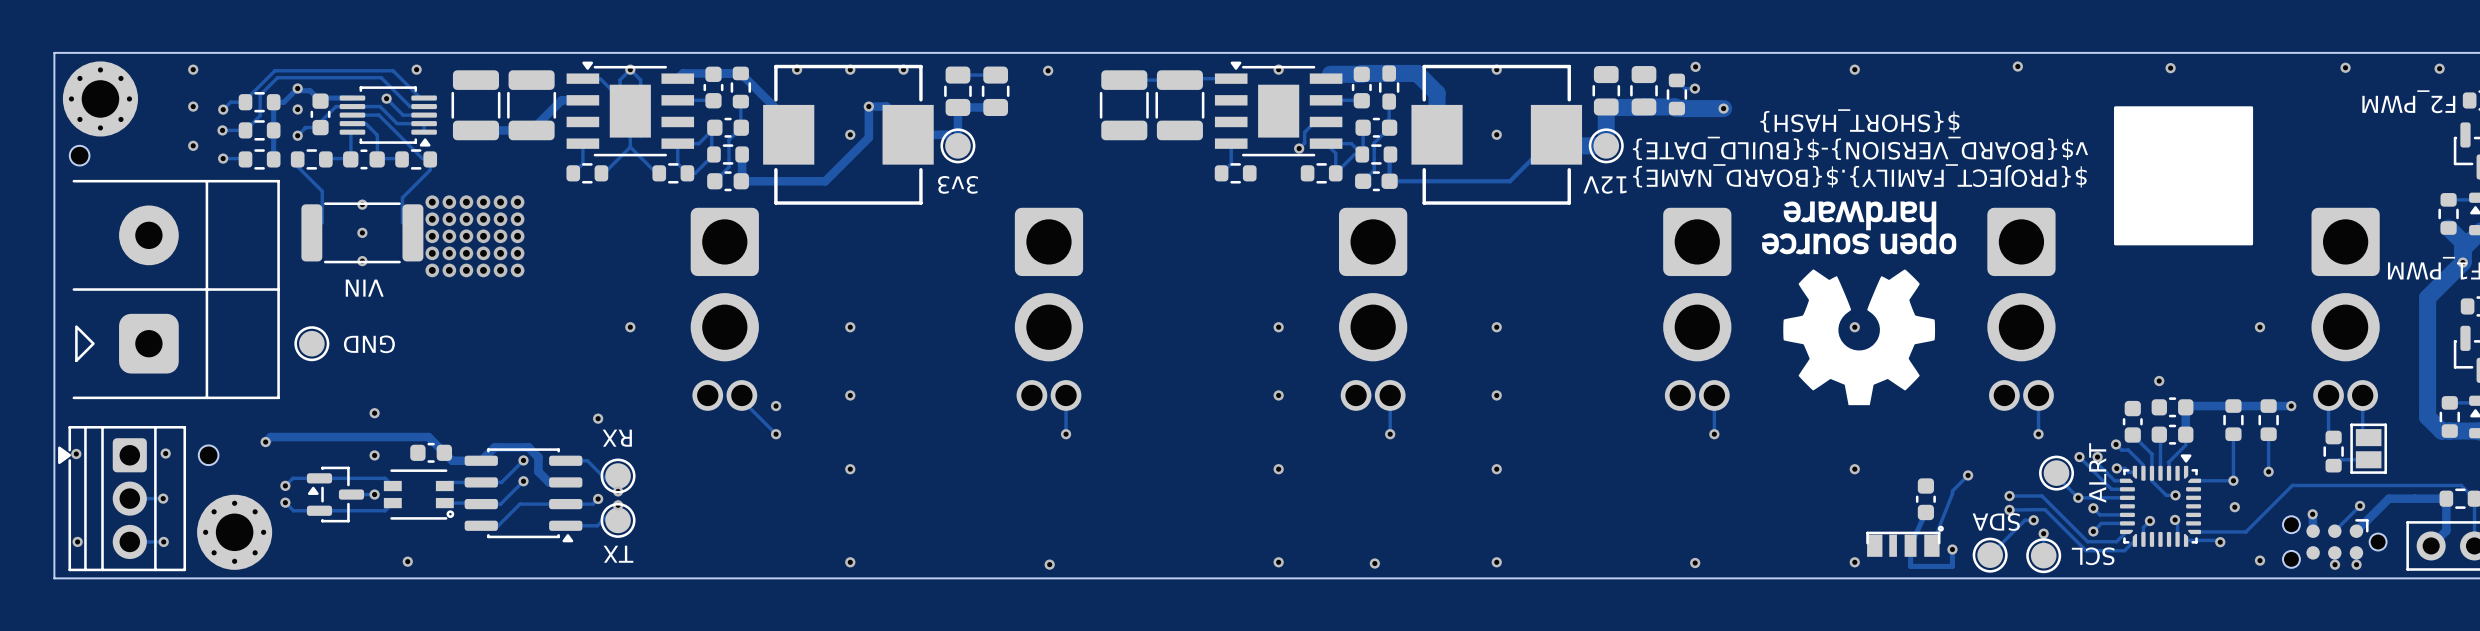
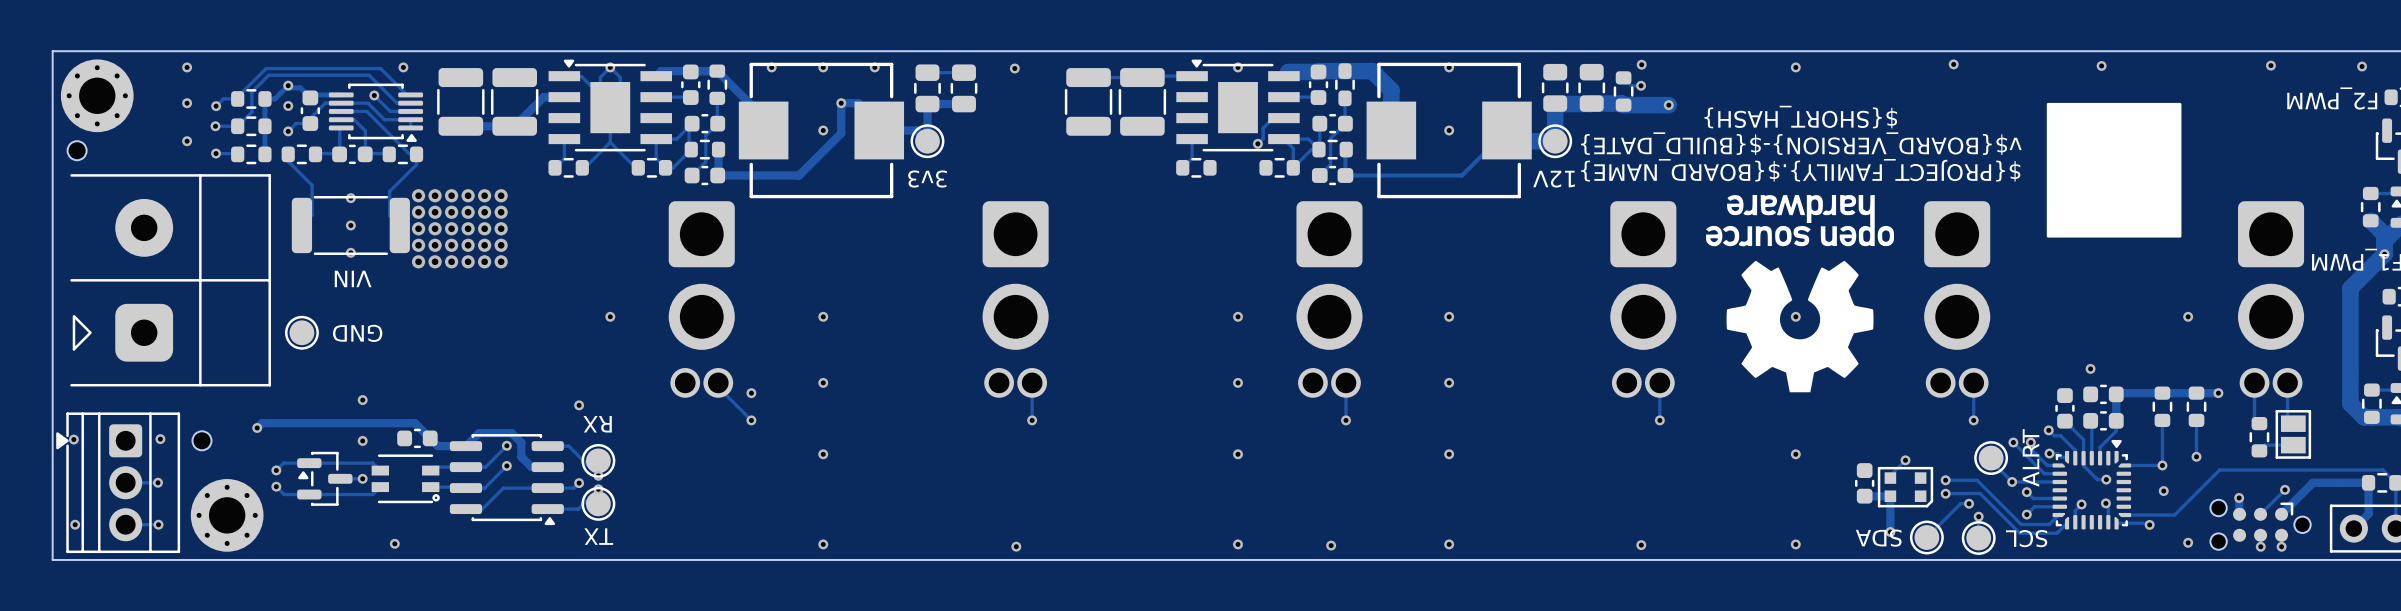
track: (1952, 493) (1931, 545) -> none
part: none -> (1905, 487)
track: (1925, 512) (1910, 545) (1910, 566) (1952, 566) (1952, 549) -> (1864, 496) (1890, 496) (1890, 532)
text position: SDA (1996, 522) -> SDA (1878, 538)
part: (1905, 541) -> none

